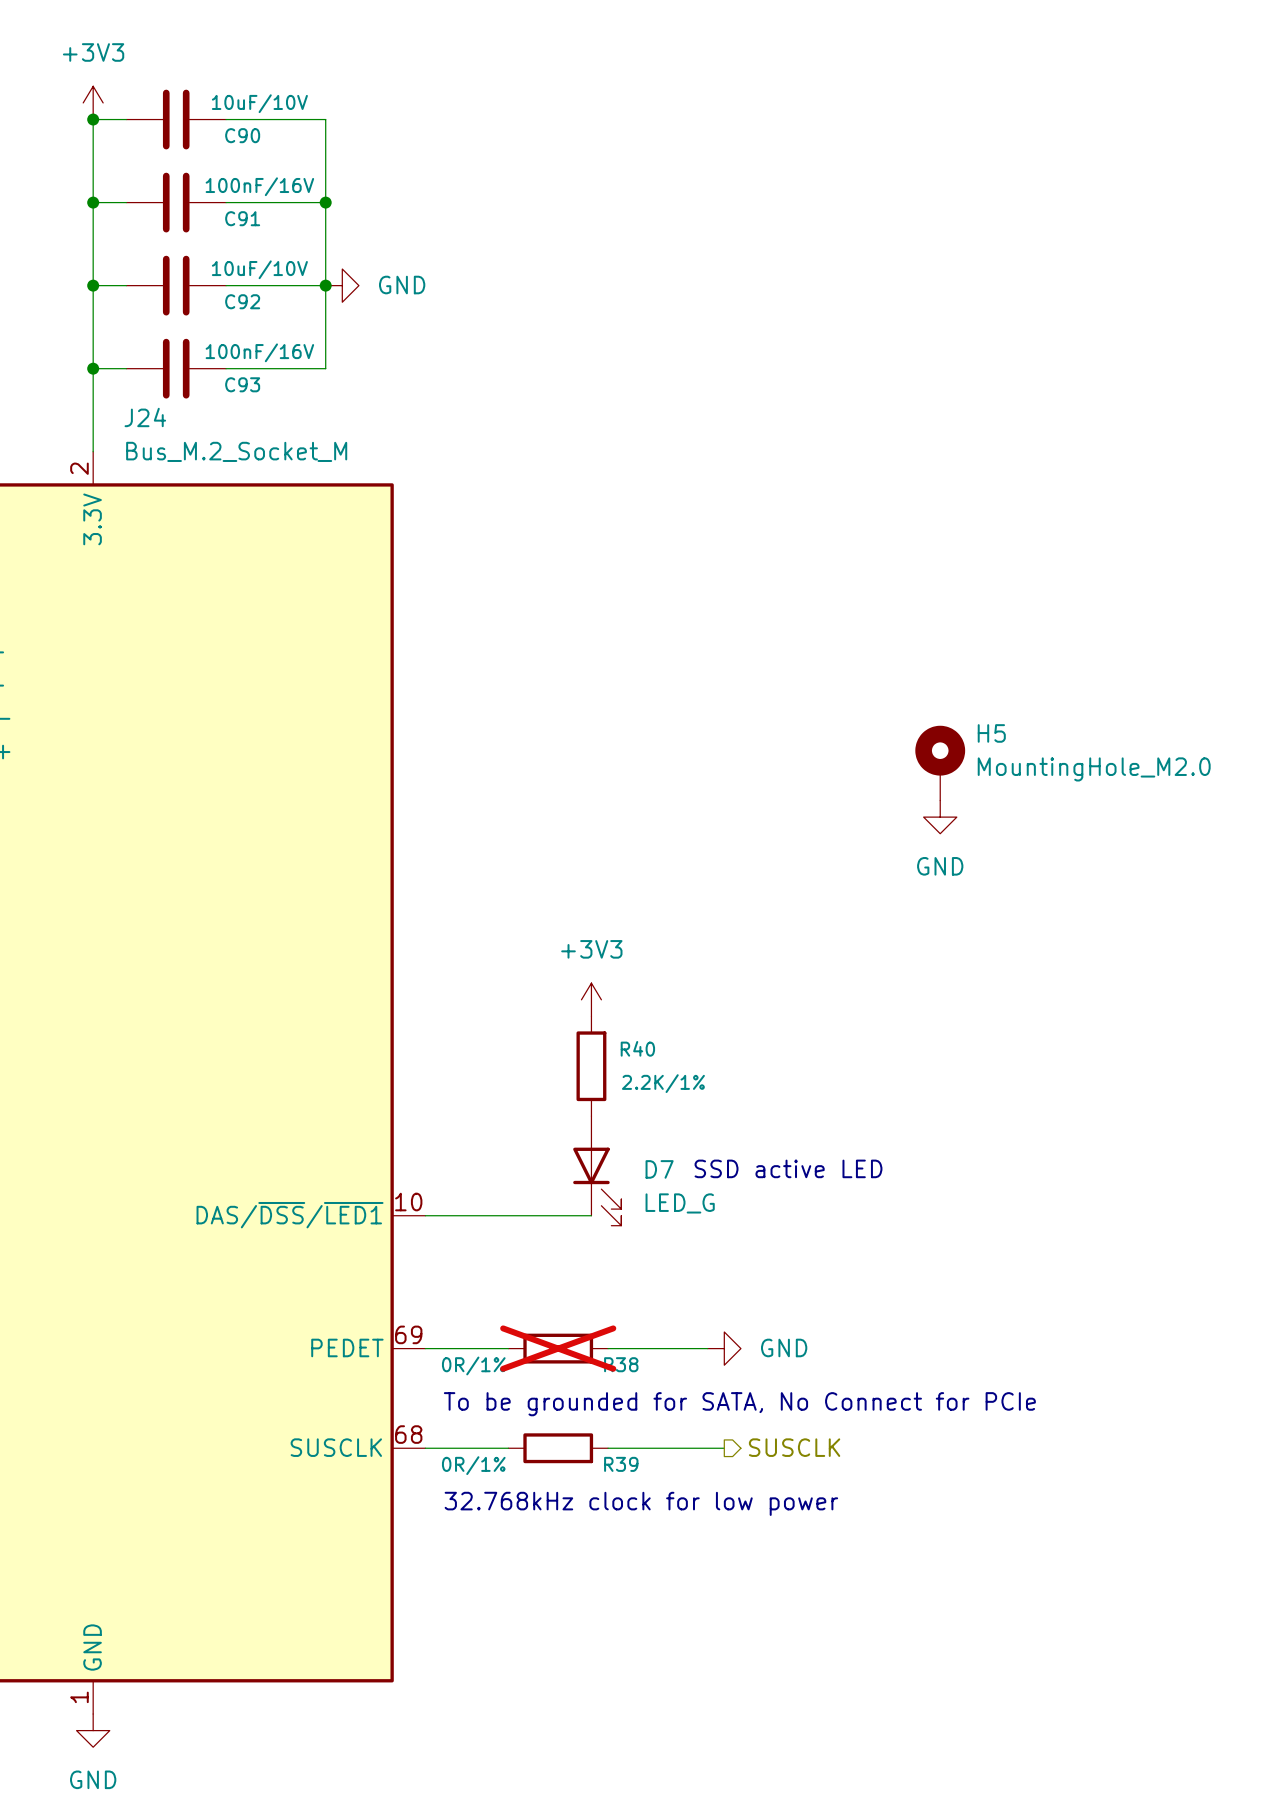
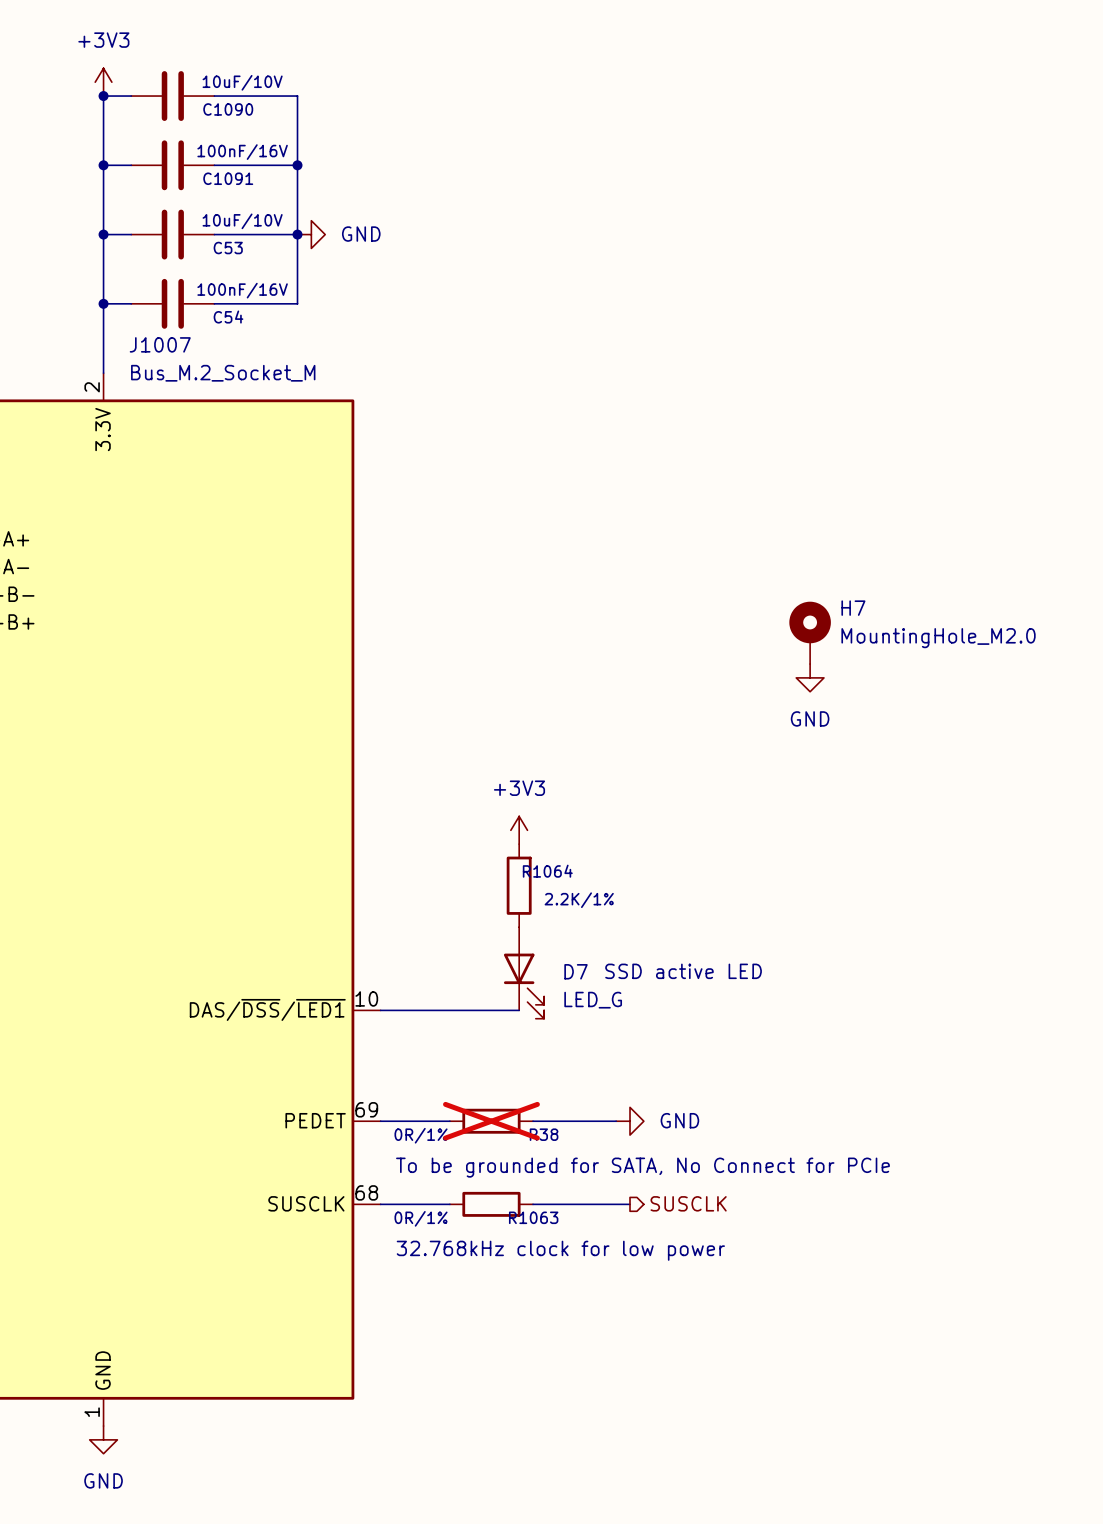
C90 name: C90 (242, 135) -> C1090 (228, 109)
C91 name: C91 (242, 218) -> C1091 (228, 178)
C92 name: C92 (242, 301) -> C53 (228, 248)
C93 name: C93 (242, 384) -> C54 (228, 317)
J24 name: J24 (145, 417) -> J1007 (160, 344)
H5 name: H5 (991, 733) -> H7 (853, 608)
R40 name: R40 (637, 1048) -> R1064 (547, 871)
R39 name: R39 (621, 1464) -> R1063 (533, 1217)

